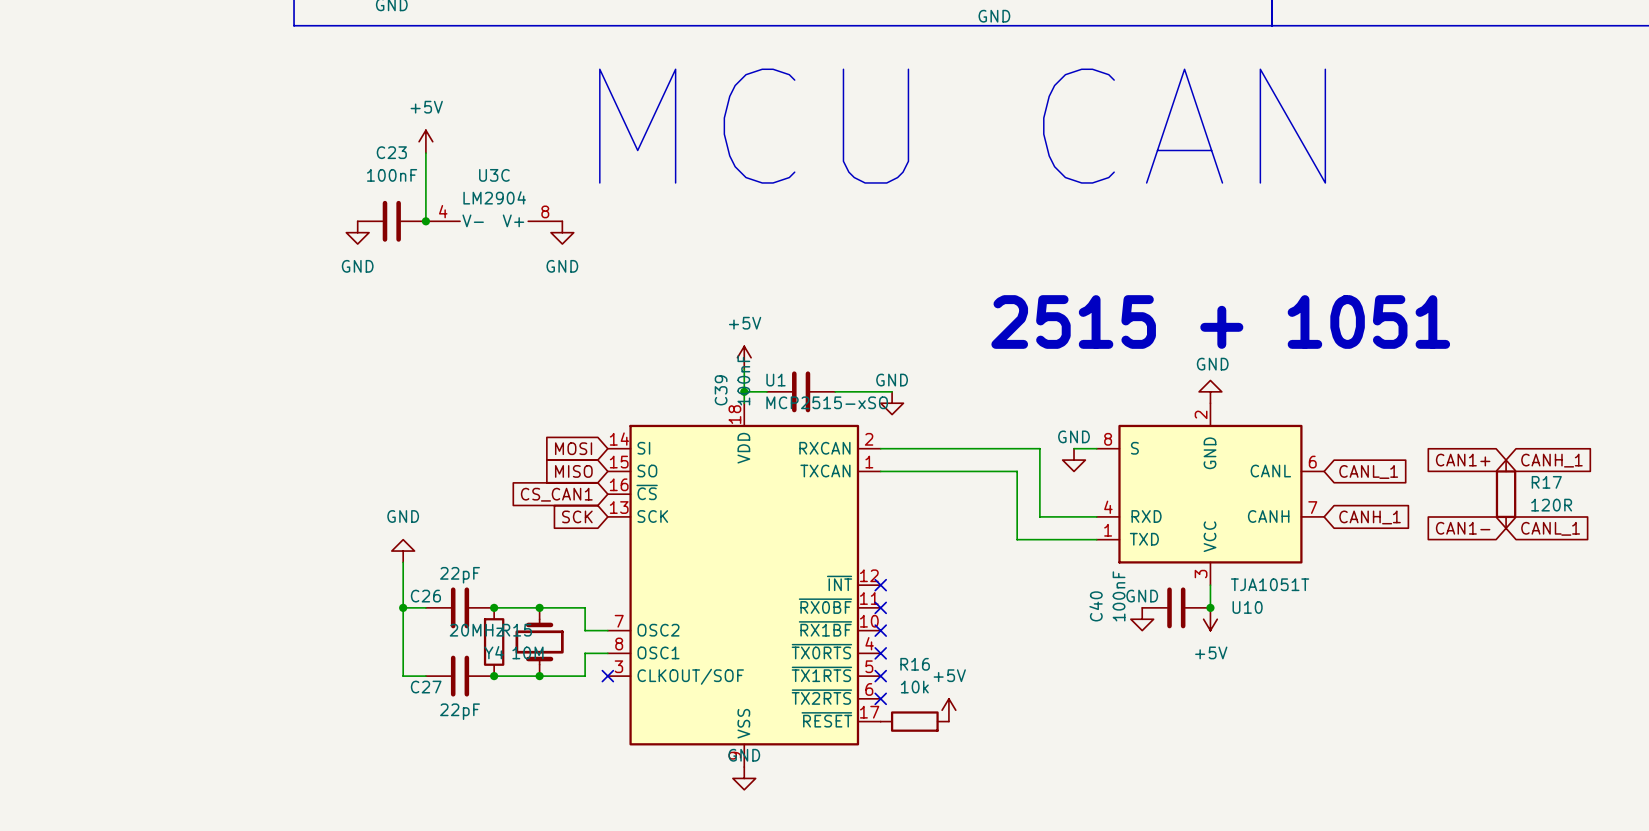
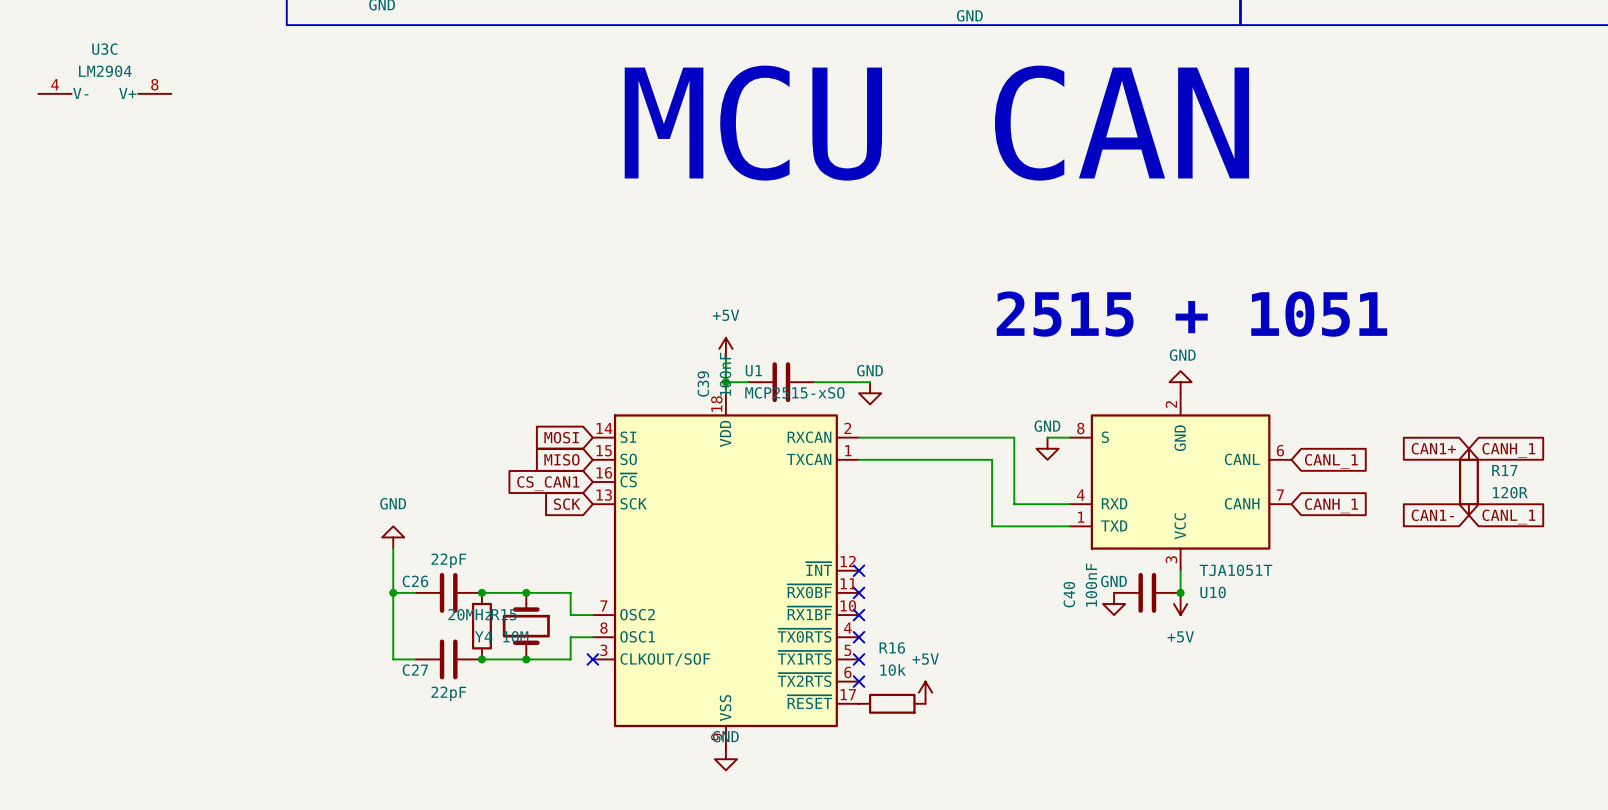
power symbol: +5V (425, 141) -> none
wire: (425, 153) (425, 221) -> none
C23: 100nF (391, 221) -> none
junction: (425, 221) -> none
U3C position: (494, 221) -> (104, 93)
power symbol: GND (357, 232) -> none
power symbol: GND (562, 232) -> none

